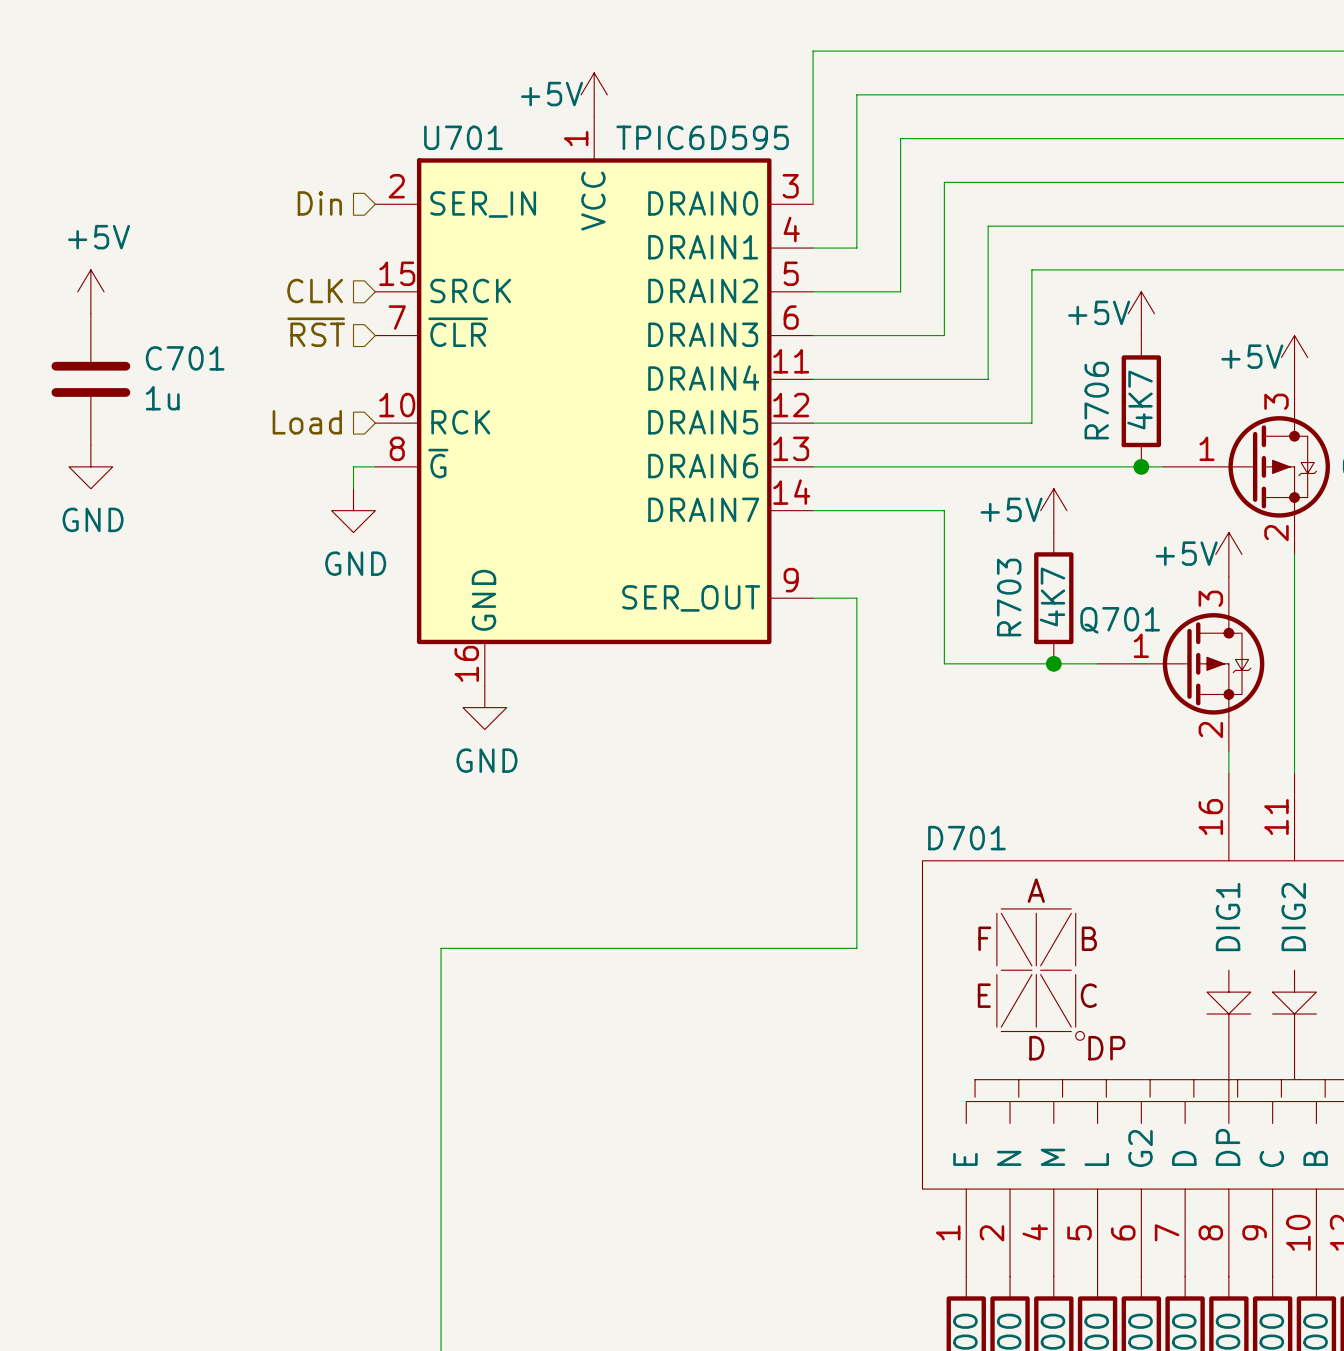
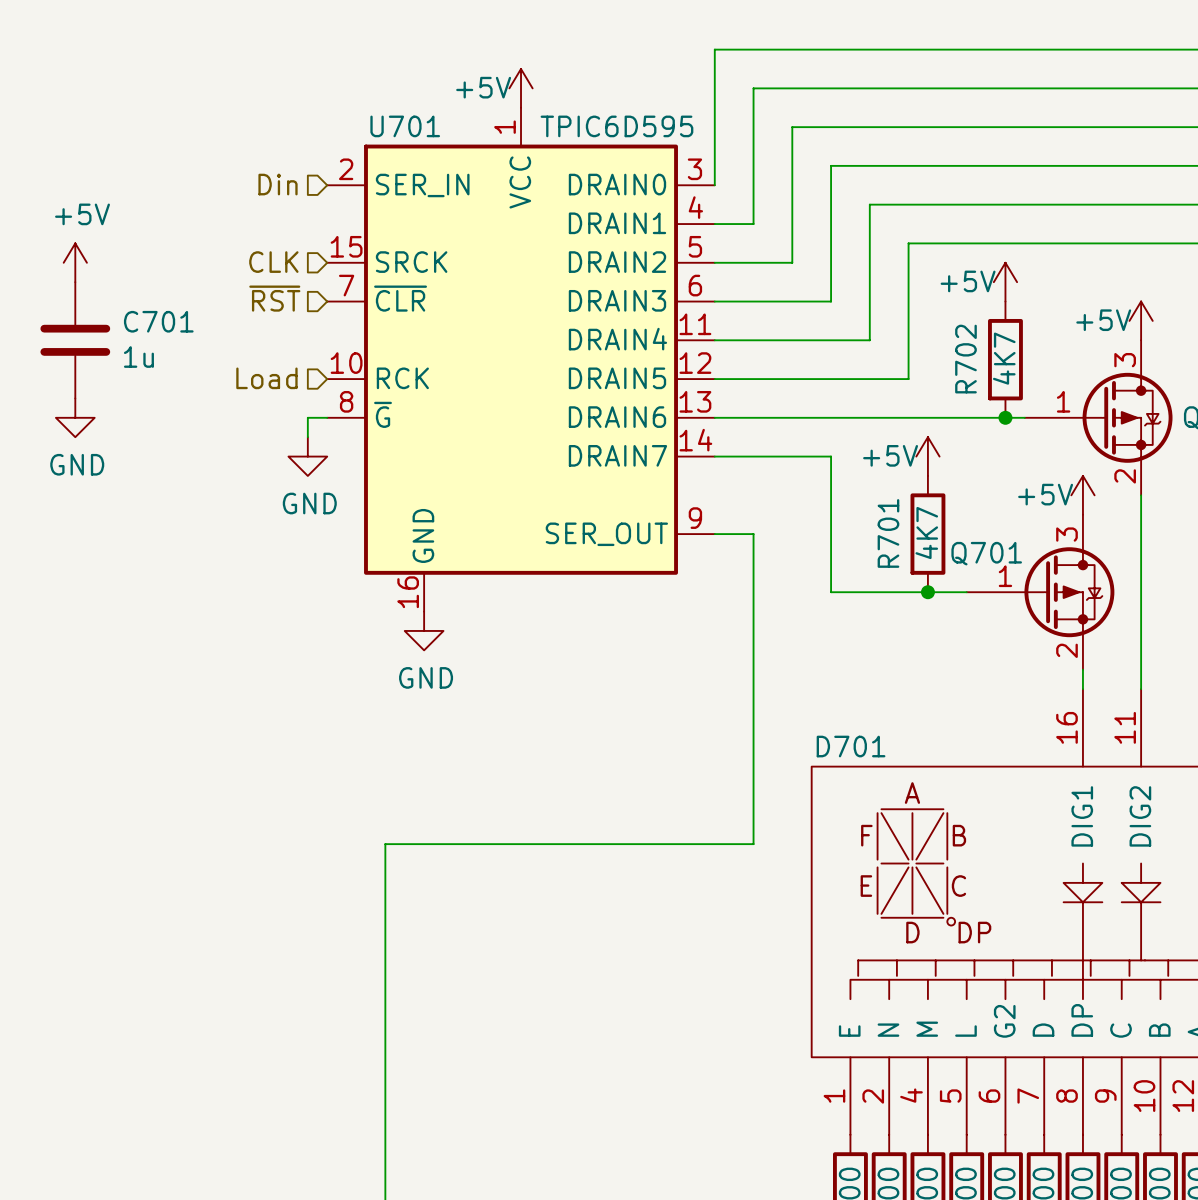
R706 name: R706 (1096, 400) -> R702 (965, 359)
R703 name: R703 (1009, 597) -> R701 (888, 533)

